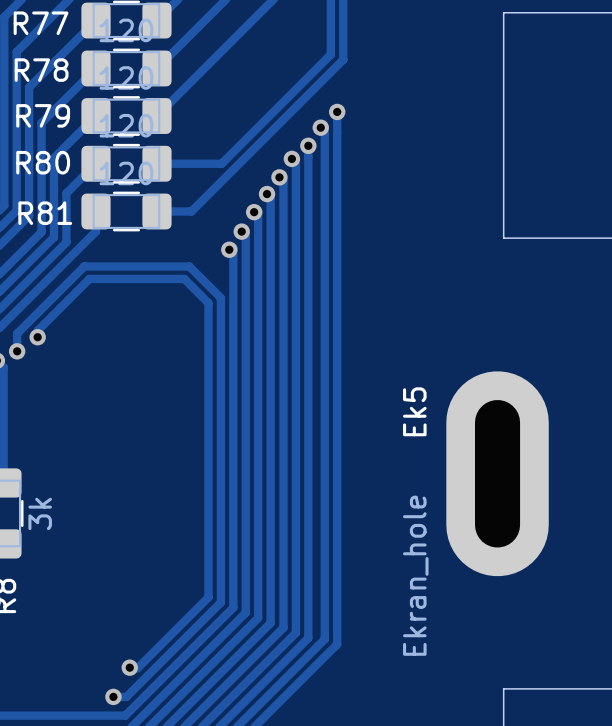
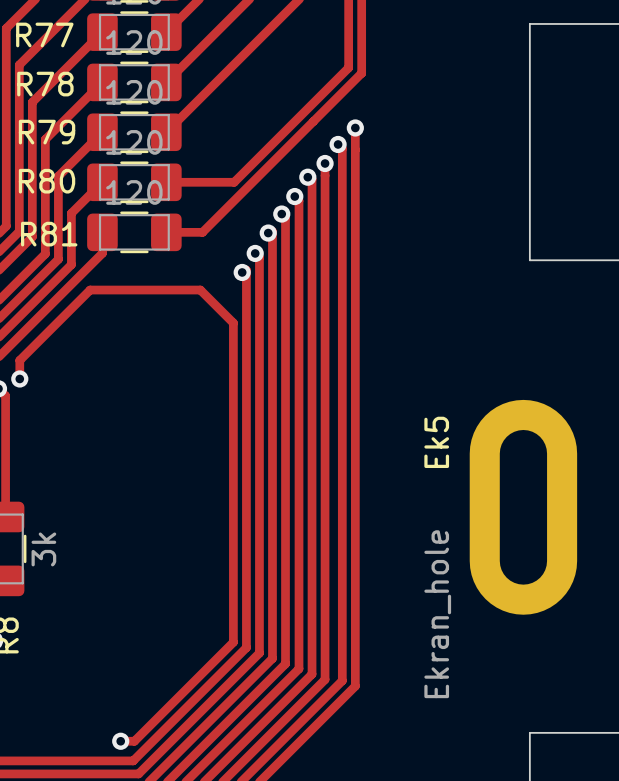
track: (37, 337) (37, 330) (89, 278) (184, 278) (208, 303) (208, 597) (137, 668) (129, 667) -> none
via: (37, 337) -> none
via: (129, 667) -> none

